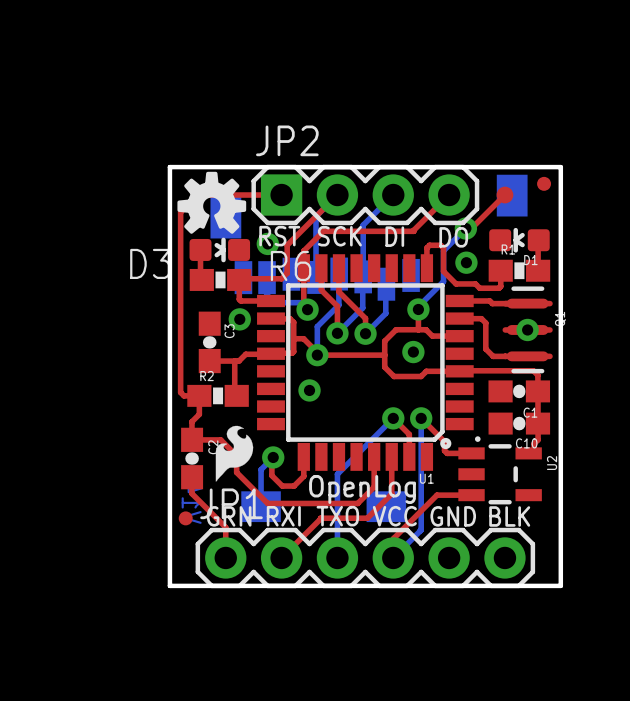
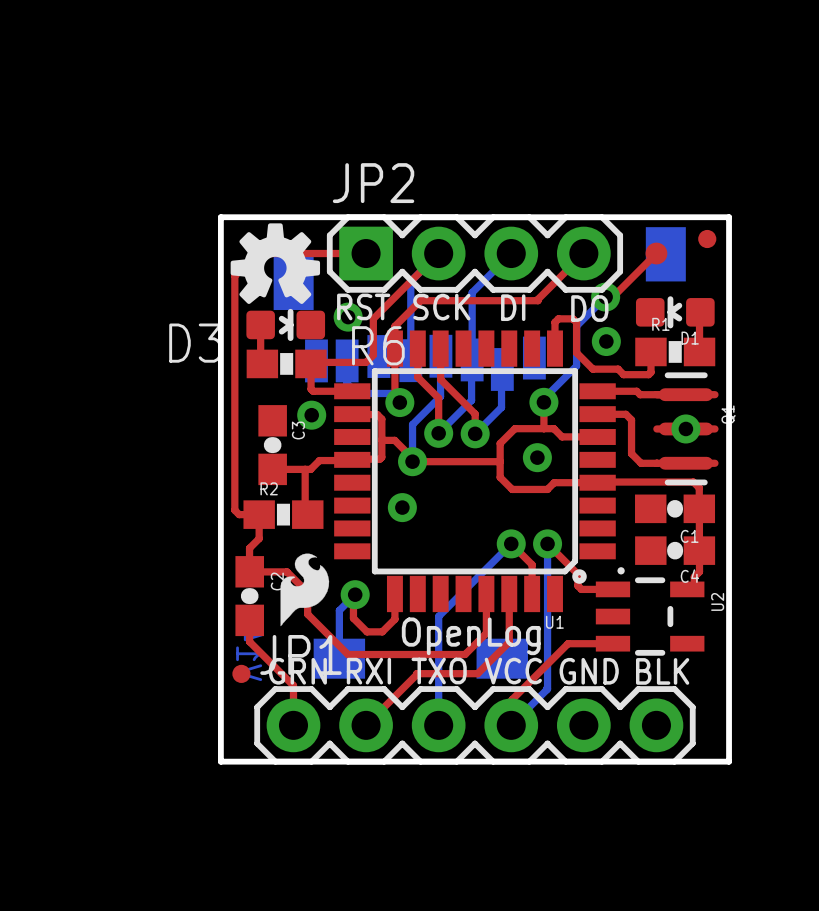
C10 name: C10 (526, 443) -> C4 (689, 576)

